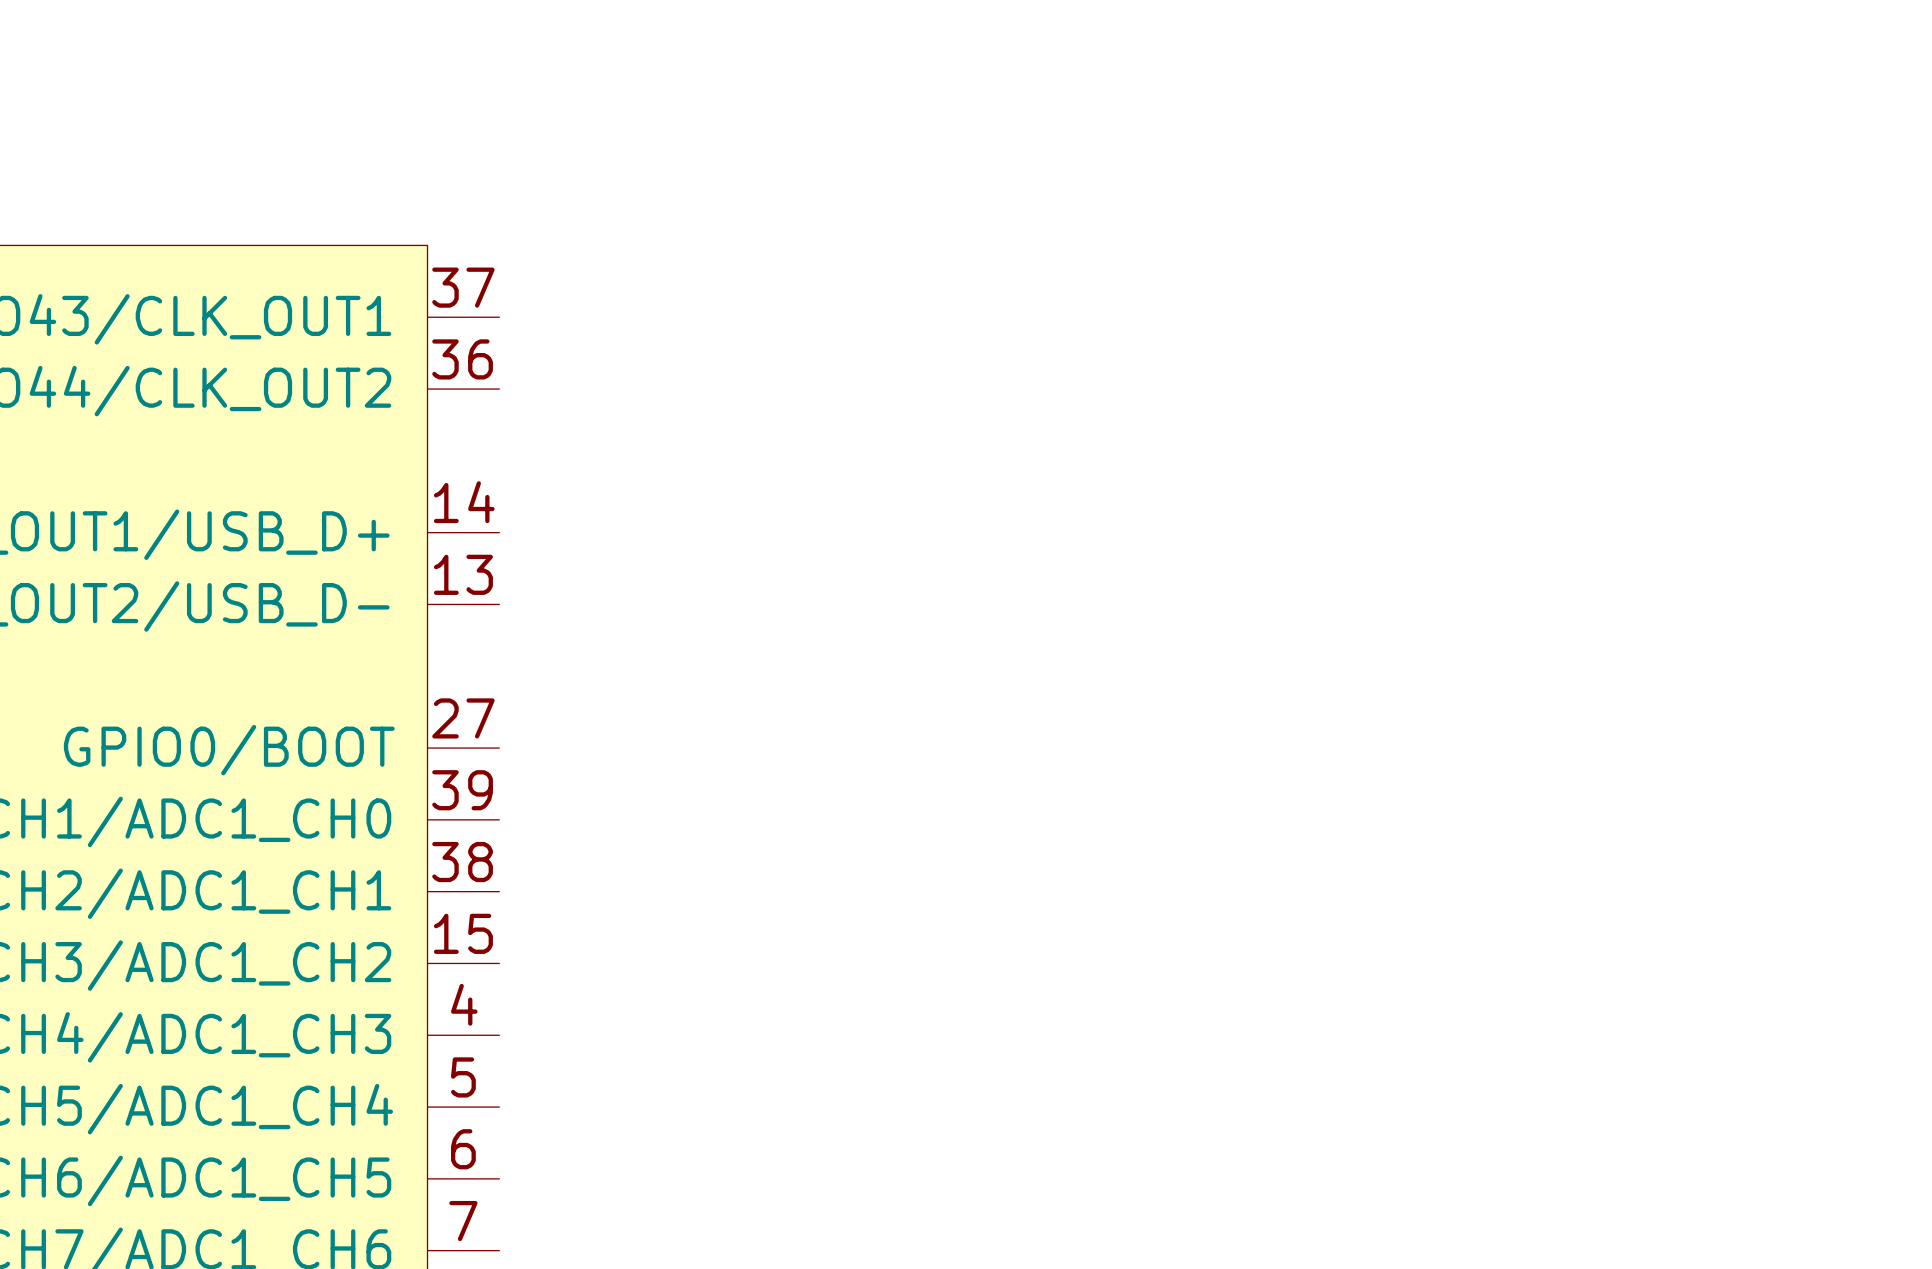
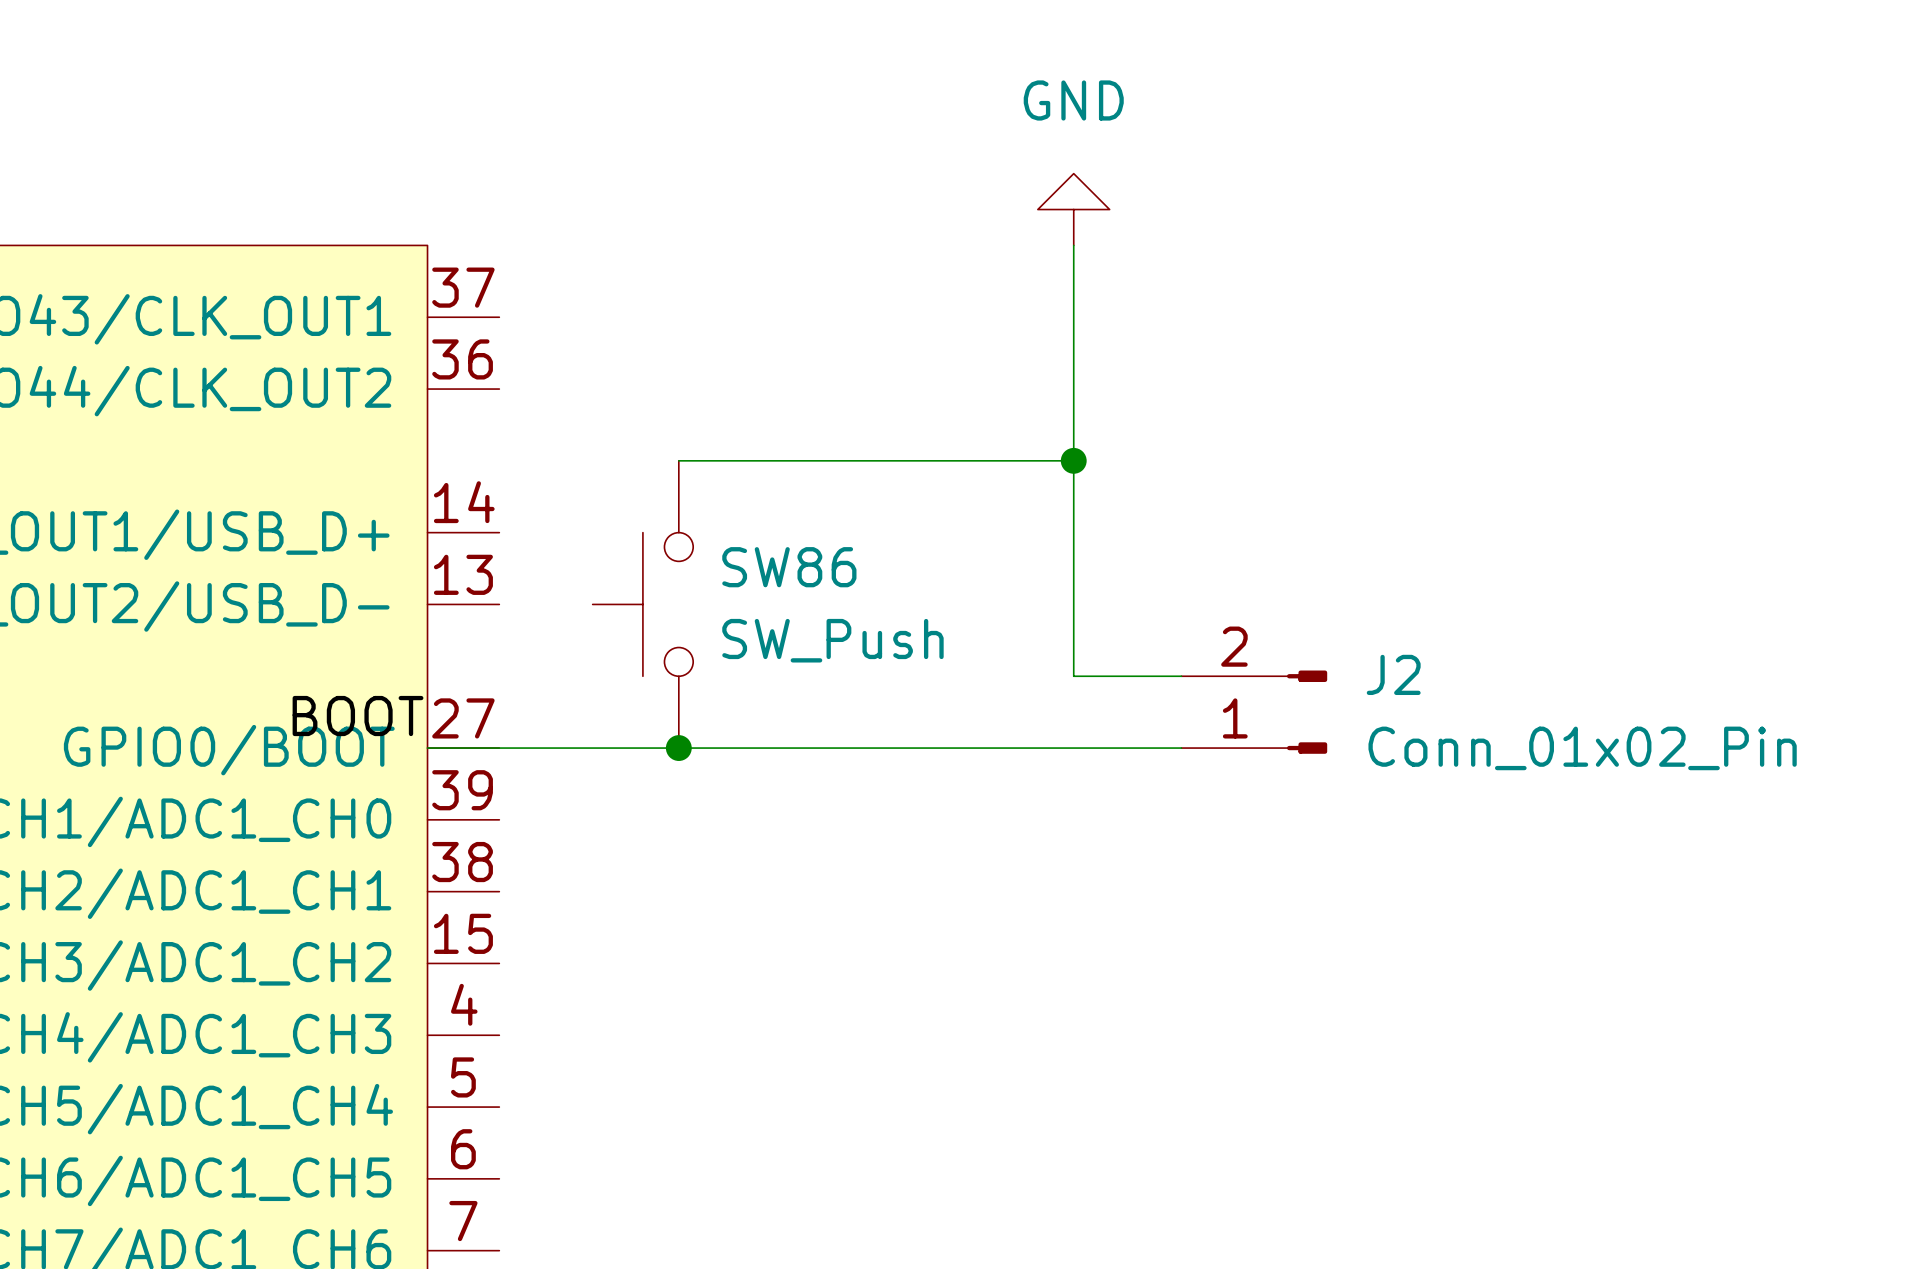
power symbol: none -> GND (1073, 209)
wire: none -> (1073, 245) (1073, 676) (1181, 676)
wire: none -> (678, 460) (1073, 460)
junction: none -> (1073, 460)
SW86: none -> SW_Push (642, 604)
J2: none -> Conn_01x02_Pin (1254, 712)
label: none -> BOOT (358, 716)
wire: none -> (427, 748) (1181, 748)
junction: none -> (678, 748)

